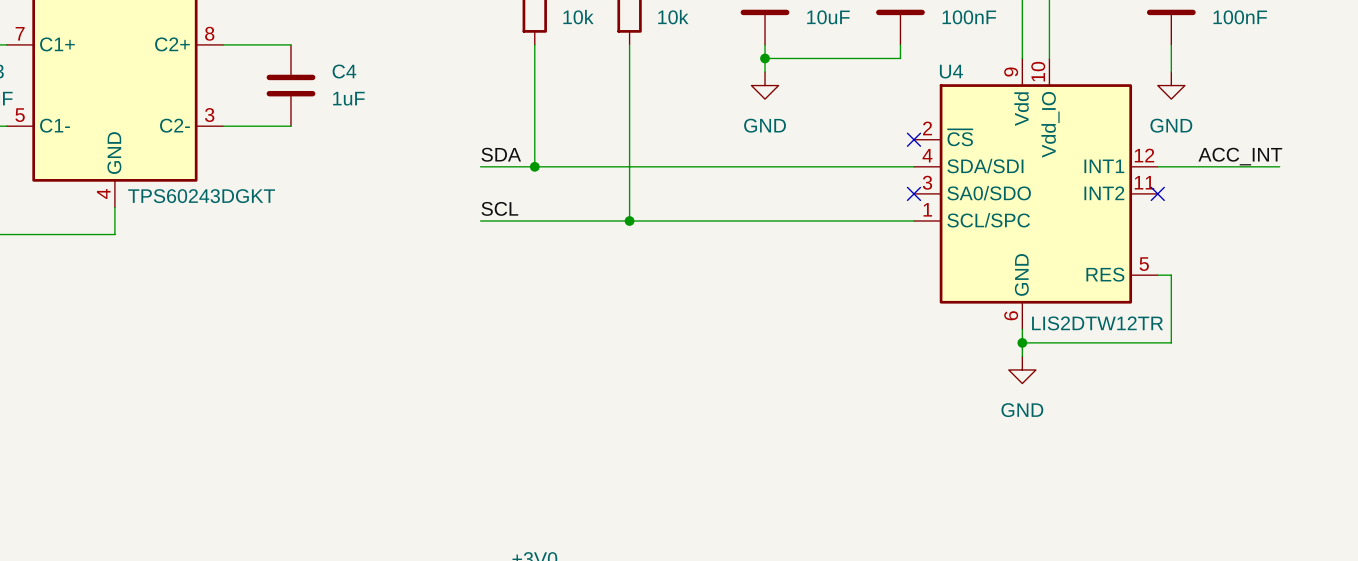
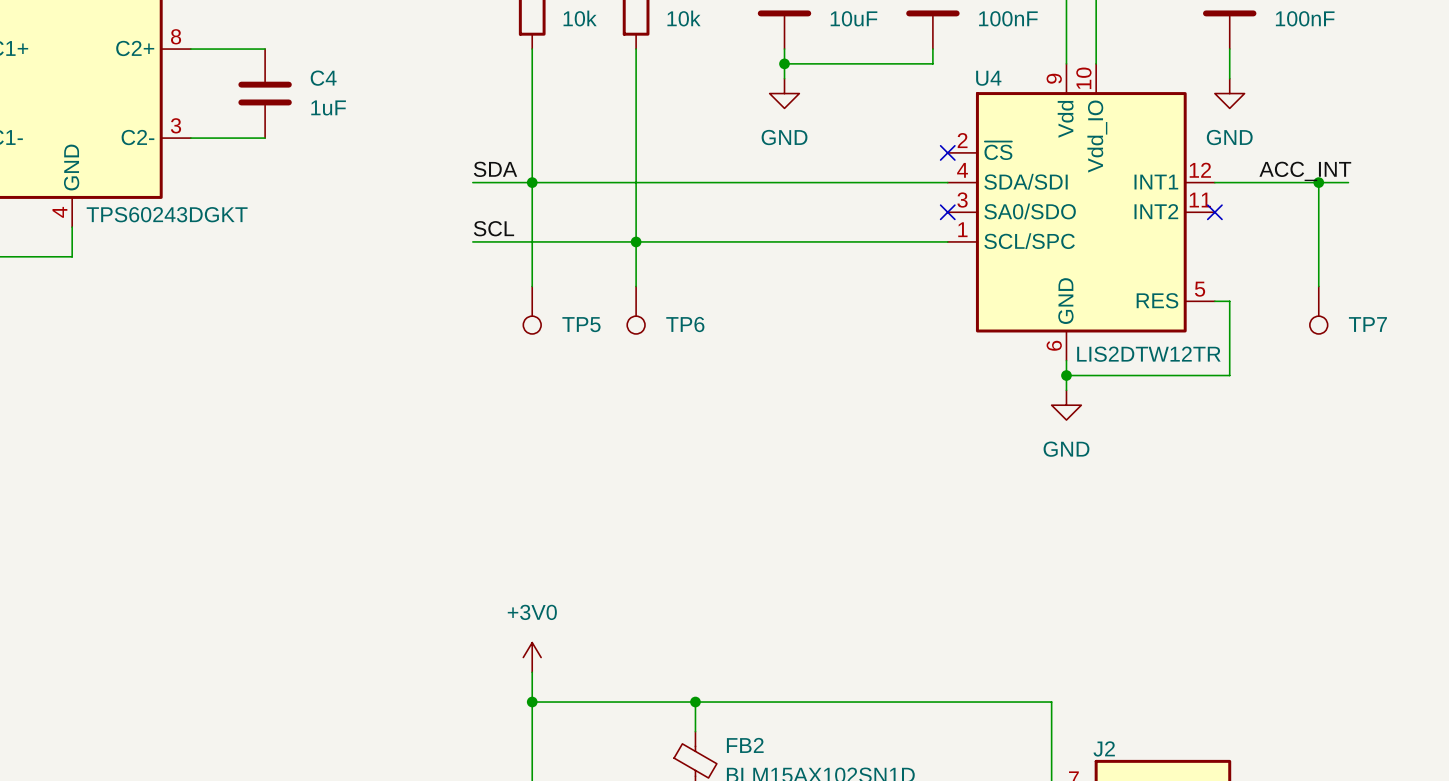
wire: none -> (532, 182) (532, 286)
wire: none -> (1318, 182) (1318, 286)
junction: none -> (1318, 182)
wire: none -> (636, 241) (636, 286)
TP5: none -> (532, 310)
TP6: none -> (636, 310)
TP7: none -> (1318, 310)

